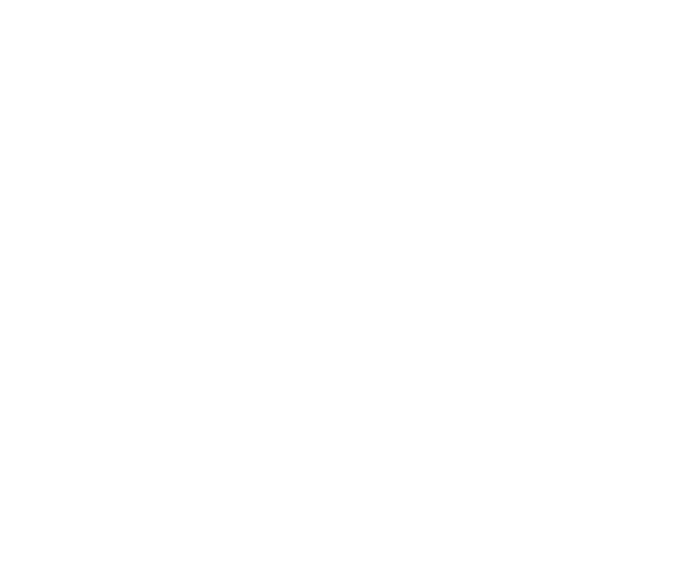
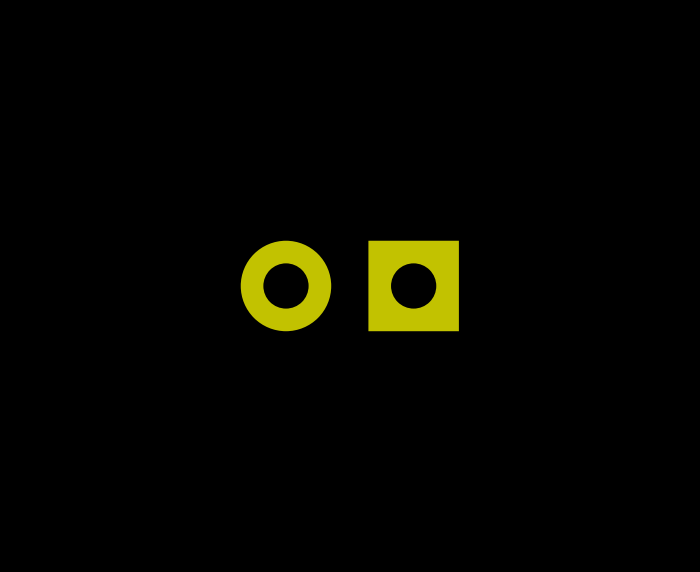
part: none -> (349, 285)

